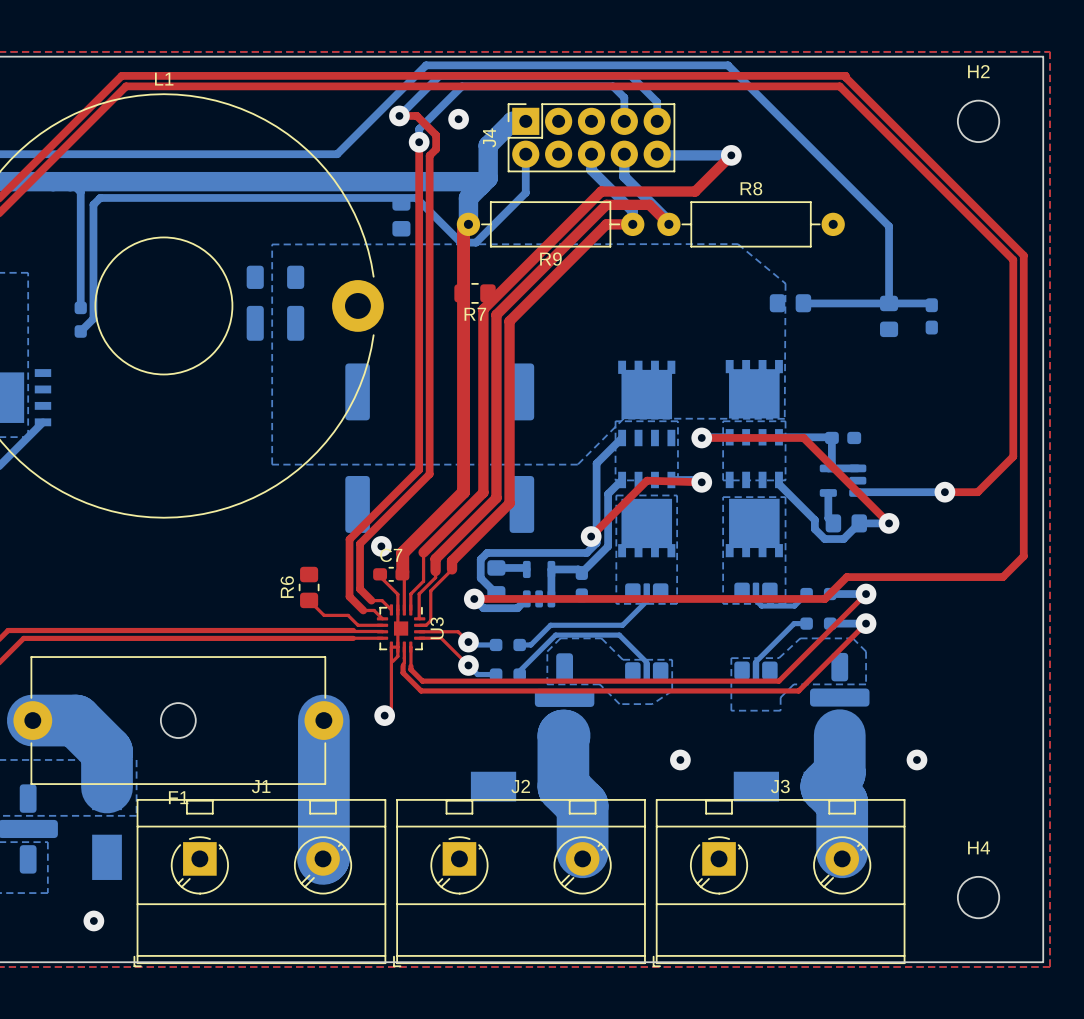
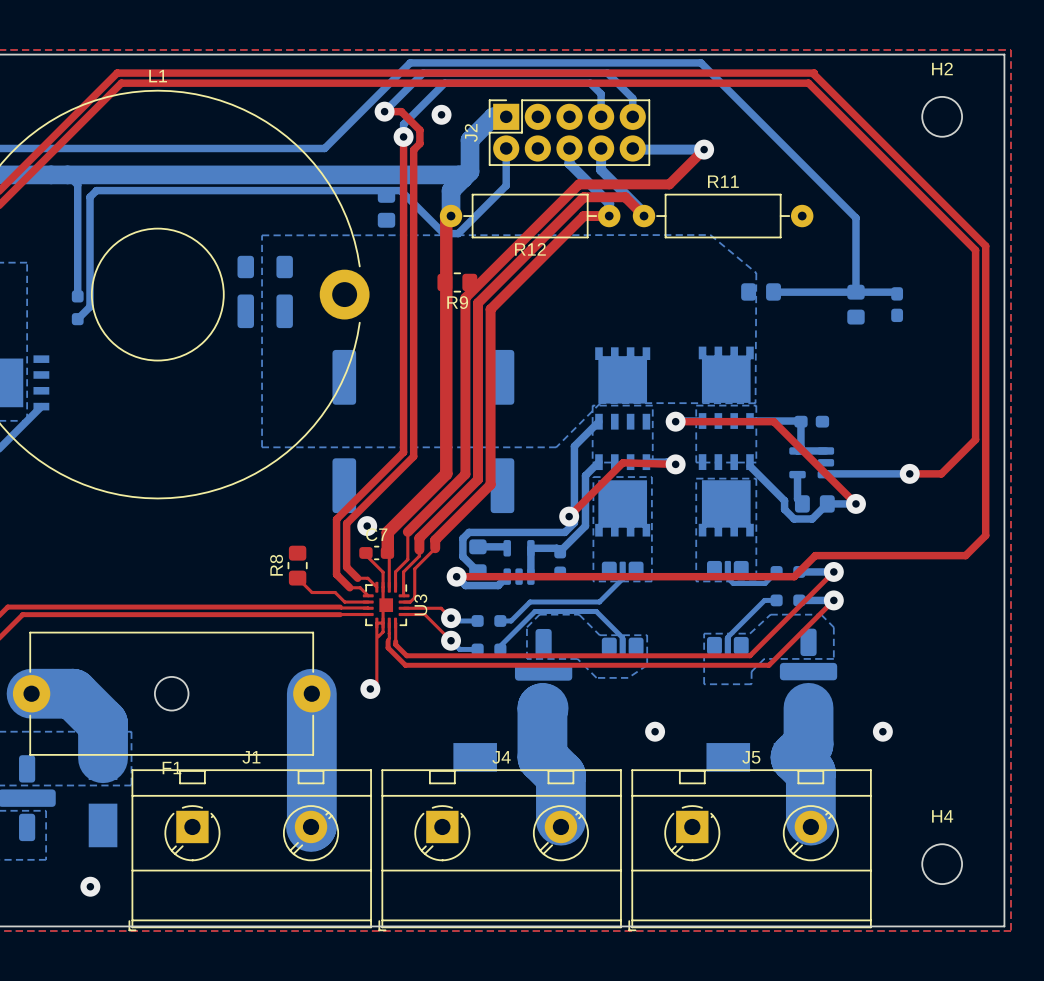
J4 name: J4 (489, 137) -> J2 (471, 132)
R8 name: R8 (751, 188) -> R11 (723, 181)
R9 name: R9 (550, 259) -> R12 (530, 249)
R7 name: R7 (475, 314) -> R9 (457, 302)
R6 name: R6 (287, 587) -> R8 (276, 565)
J2 name: J2 (520, 786) -> J4 (501, 757)
J3 name: J3 (780, 786) -> J5 (751, 757)

